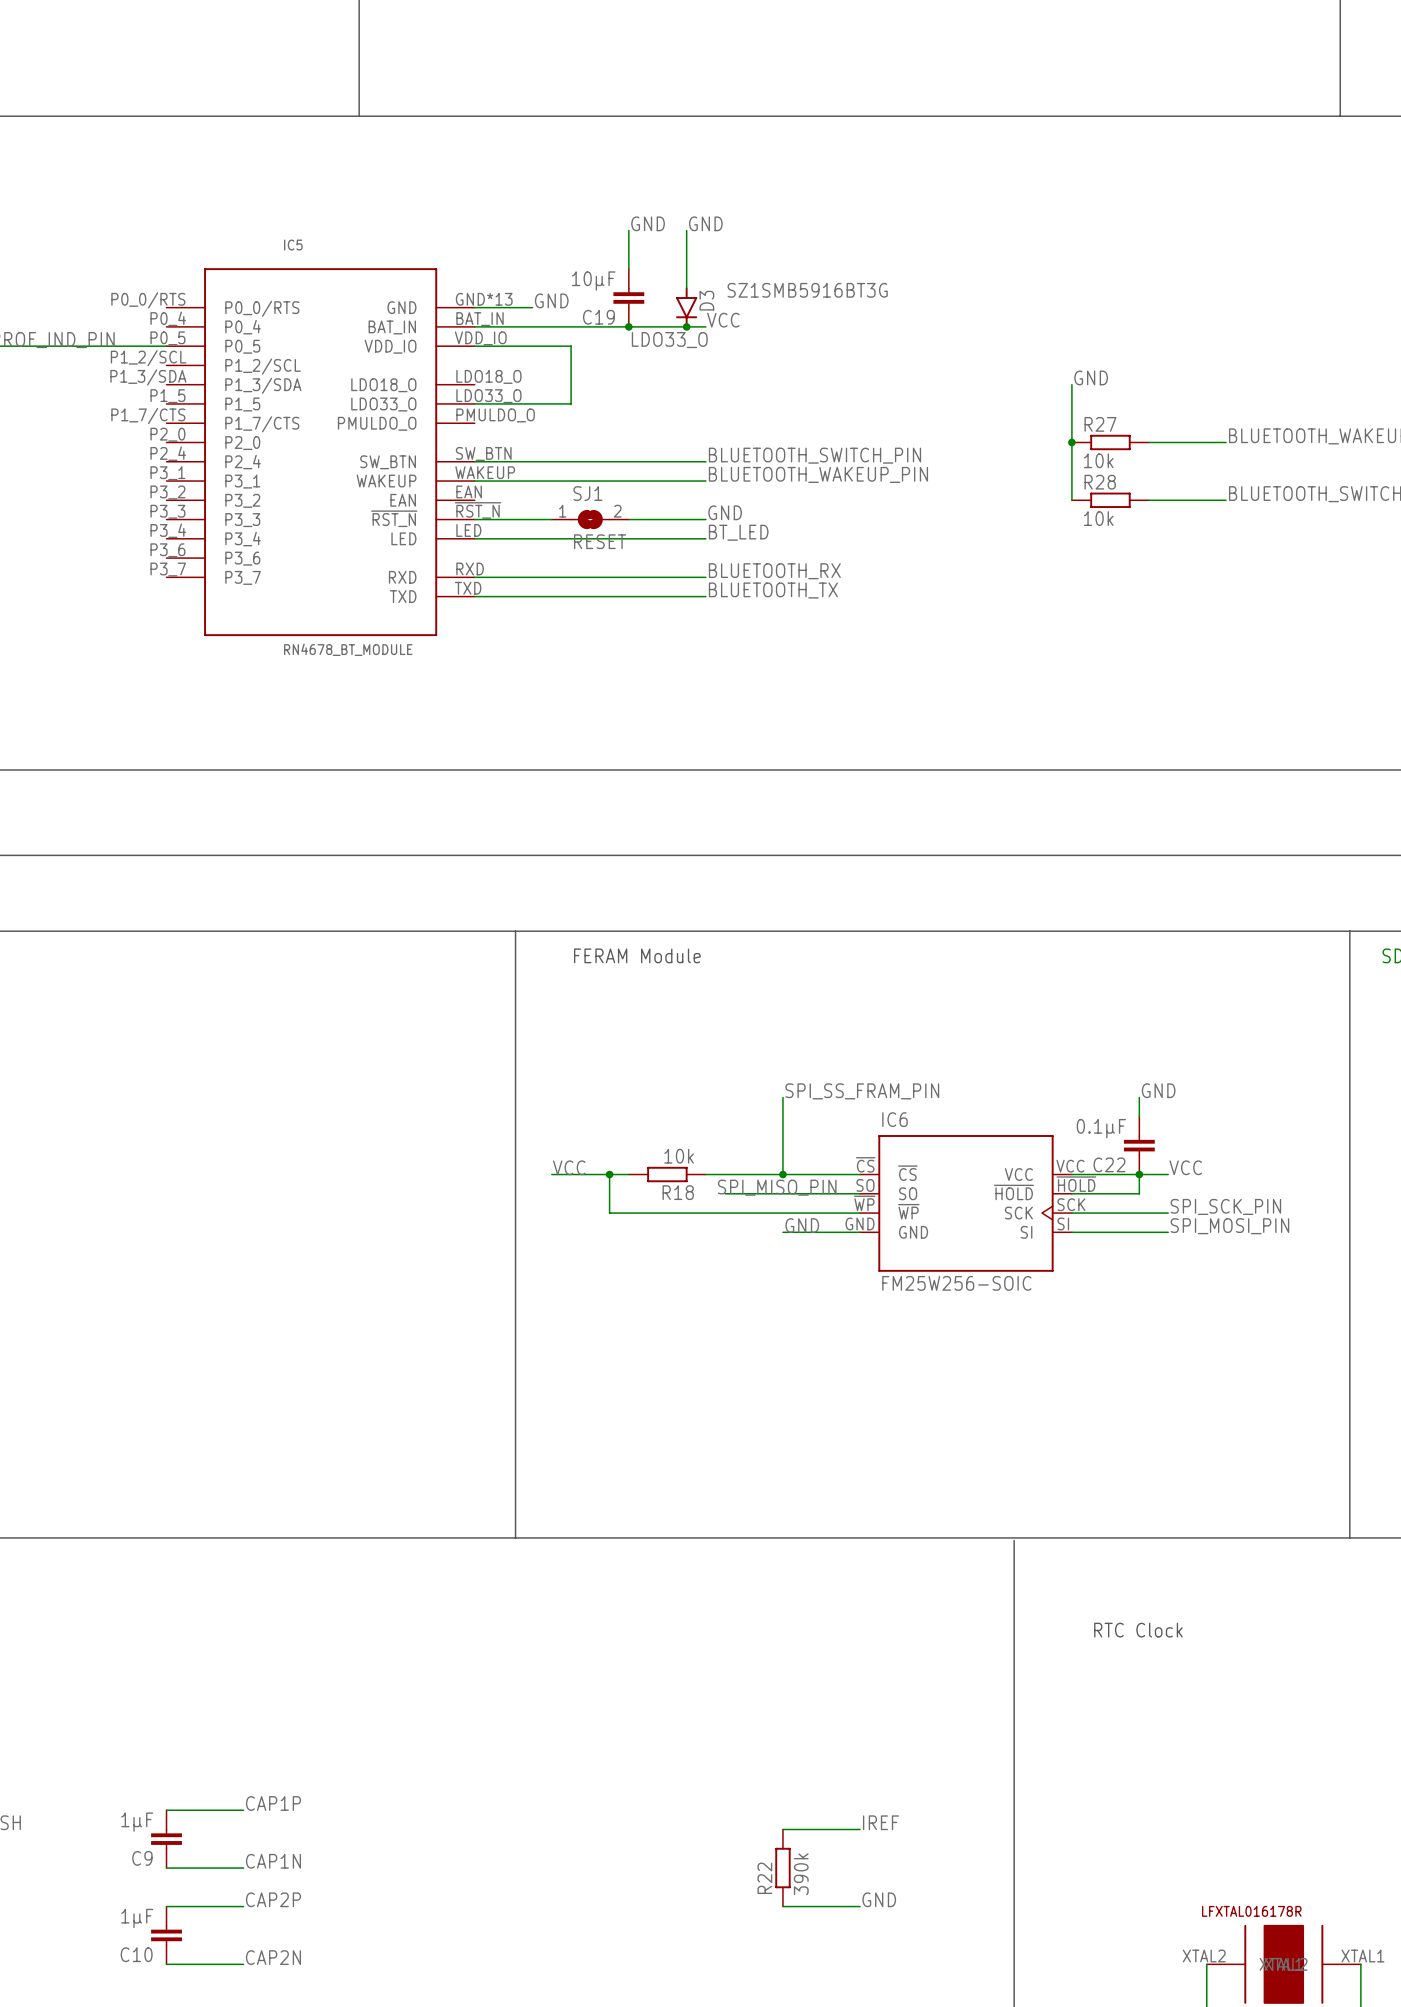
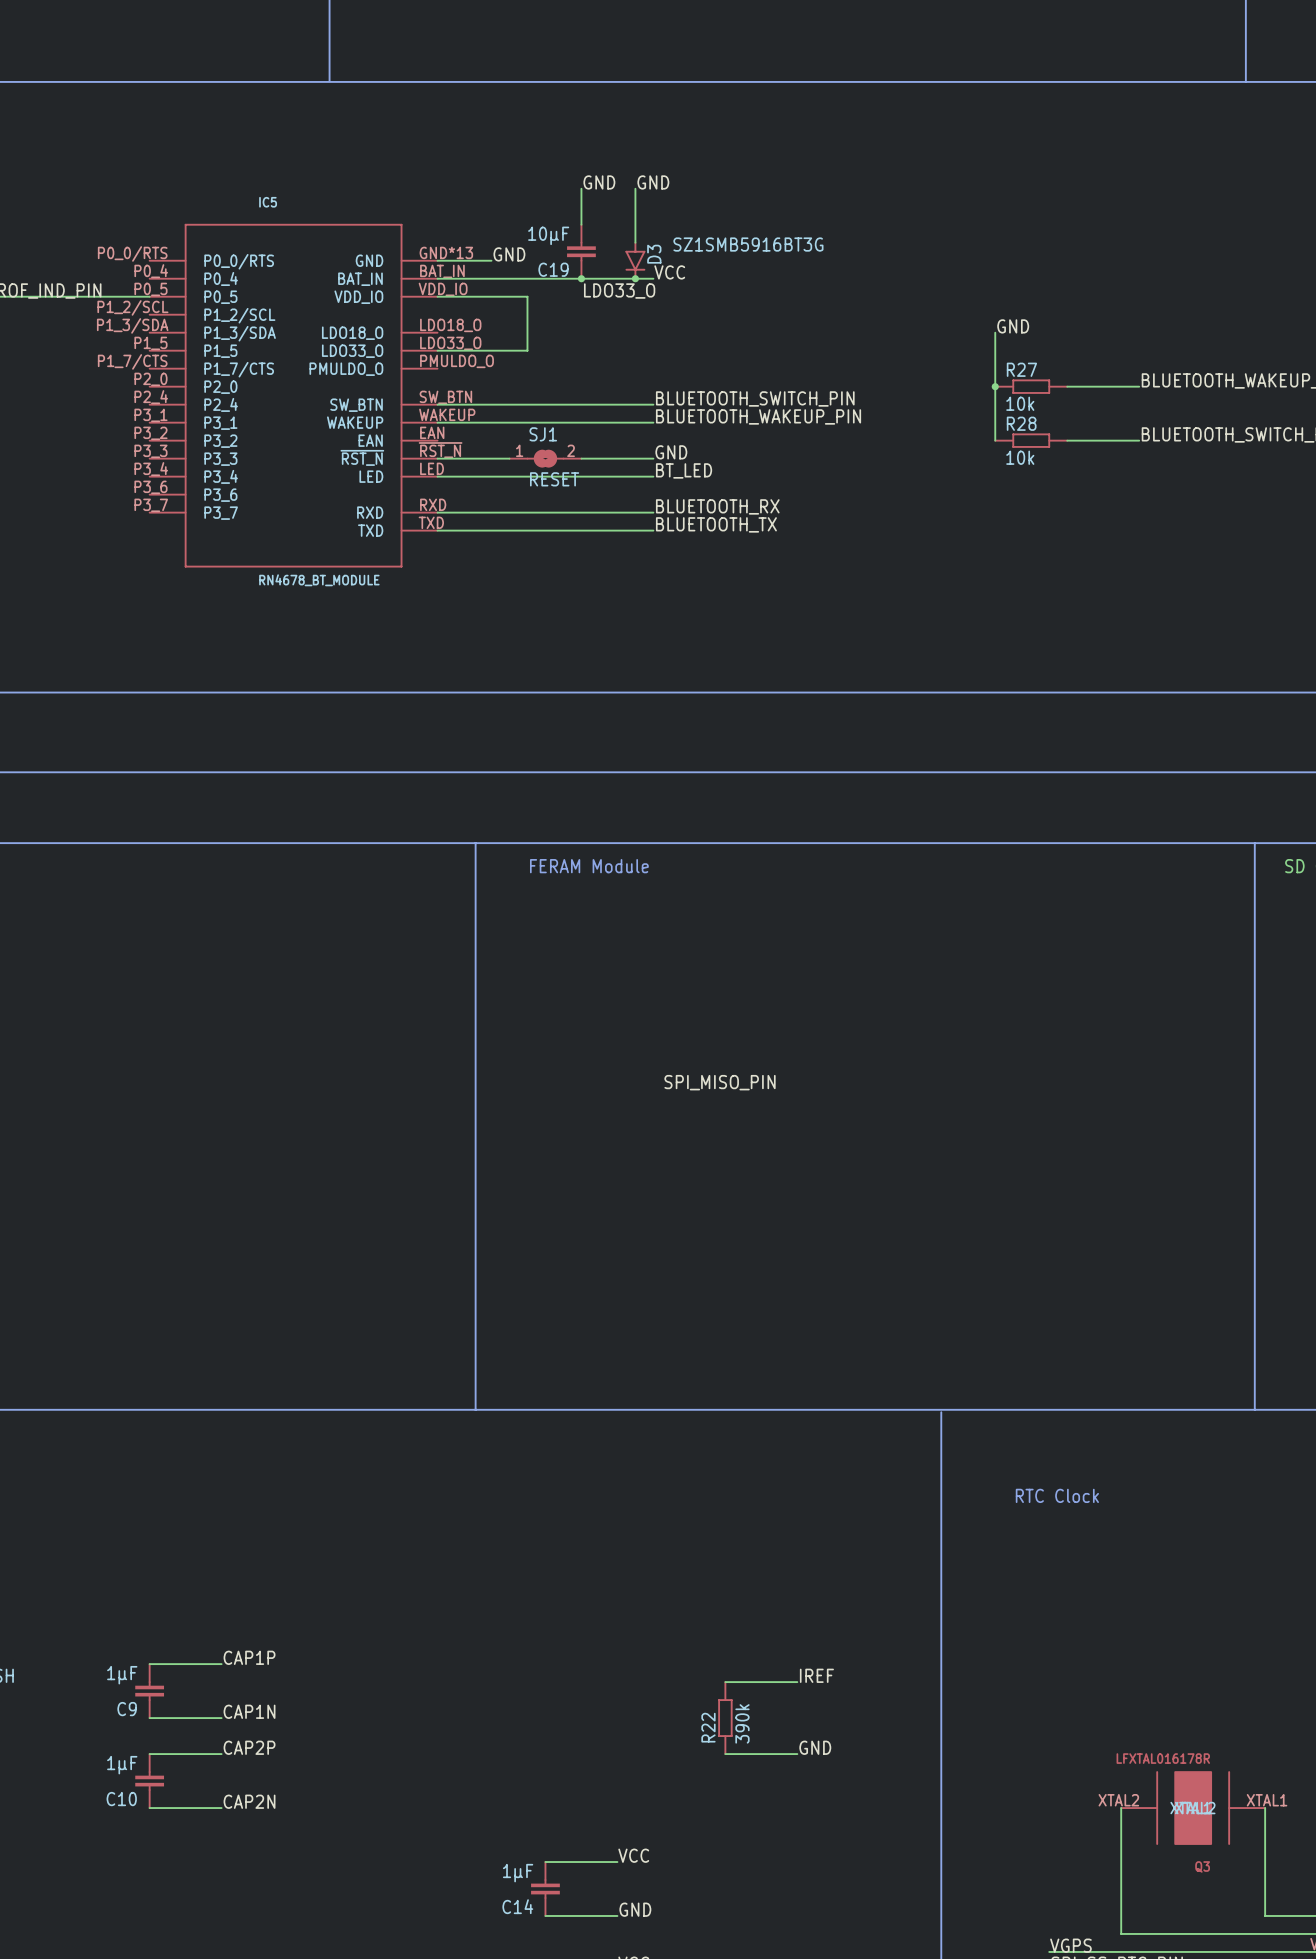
label: GND (1158, 1090) -> none
label: SPI_SS_FRAM_PIN (862, 1091) -> none
wire: (782, 1097) (782, 1174) -> none
wire: (1139, 1097) (1139, 1116) -> none
C22: 0.1µF (1139, 1145) -> none
label: VCC (569, 1167) -> none
label: VCC (1185, 1167) -> none
wire: (551, 1174) (628, 1174) -> none
wire: (609, 1174) (609, 1213) (860, 1213) -> none
junction: (609, 1174) -> none
R18: 10k (667, 1174) -> none
wire: (705, 1174) (860, 1174) -> none
junction: (782, 1174) -> none
wire: (1071, 1174) (1168, 1174) -> none
wire: (1139, 1174) (1139, 1193) (1071, 1193) -> none
junction: (1139, 1174) -> none
wire: (725, 1193) (860, 1193) -> none
IC6: FM25W256-SOIC (965, 1203) -> none
label: SPI_SCK_PIN (1225, 1206) -> none
wire: (1071, 1213) (1168, 1213) -> none
label: GND (802, 1225) -> none
label: SPI_MOSI_PIN (1229, 1226) -> none
wire: (782, 1232) (860, 1232) -> none
wire: (1071, 1232) (1168, 1232) -> none

